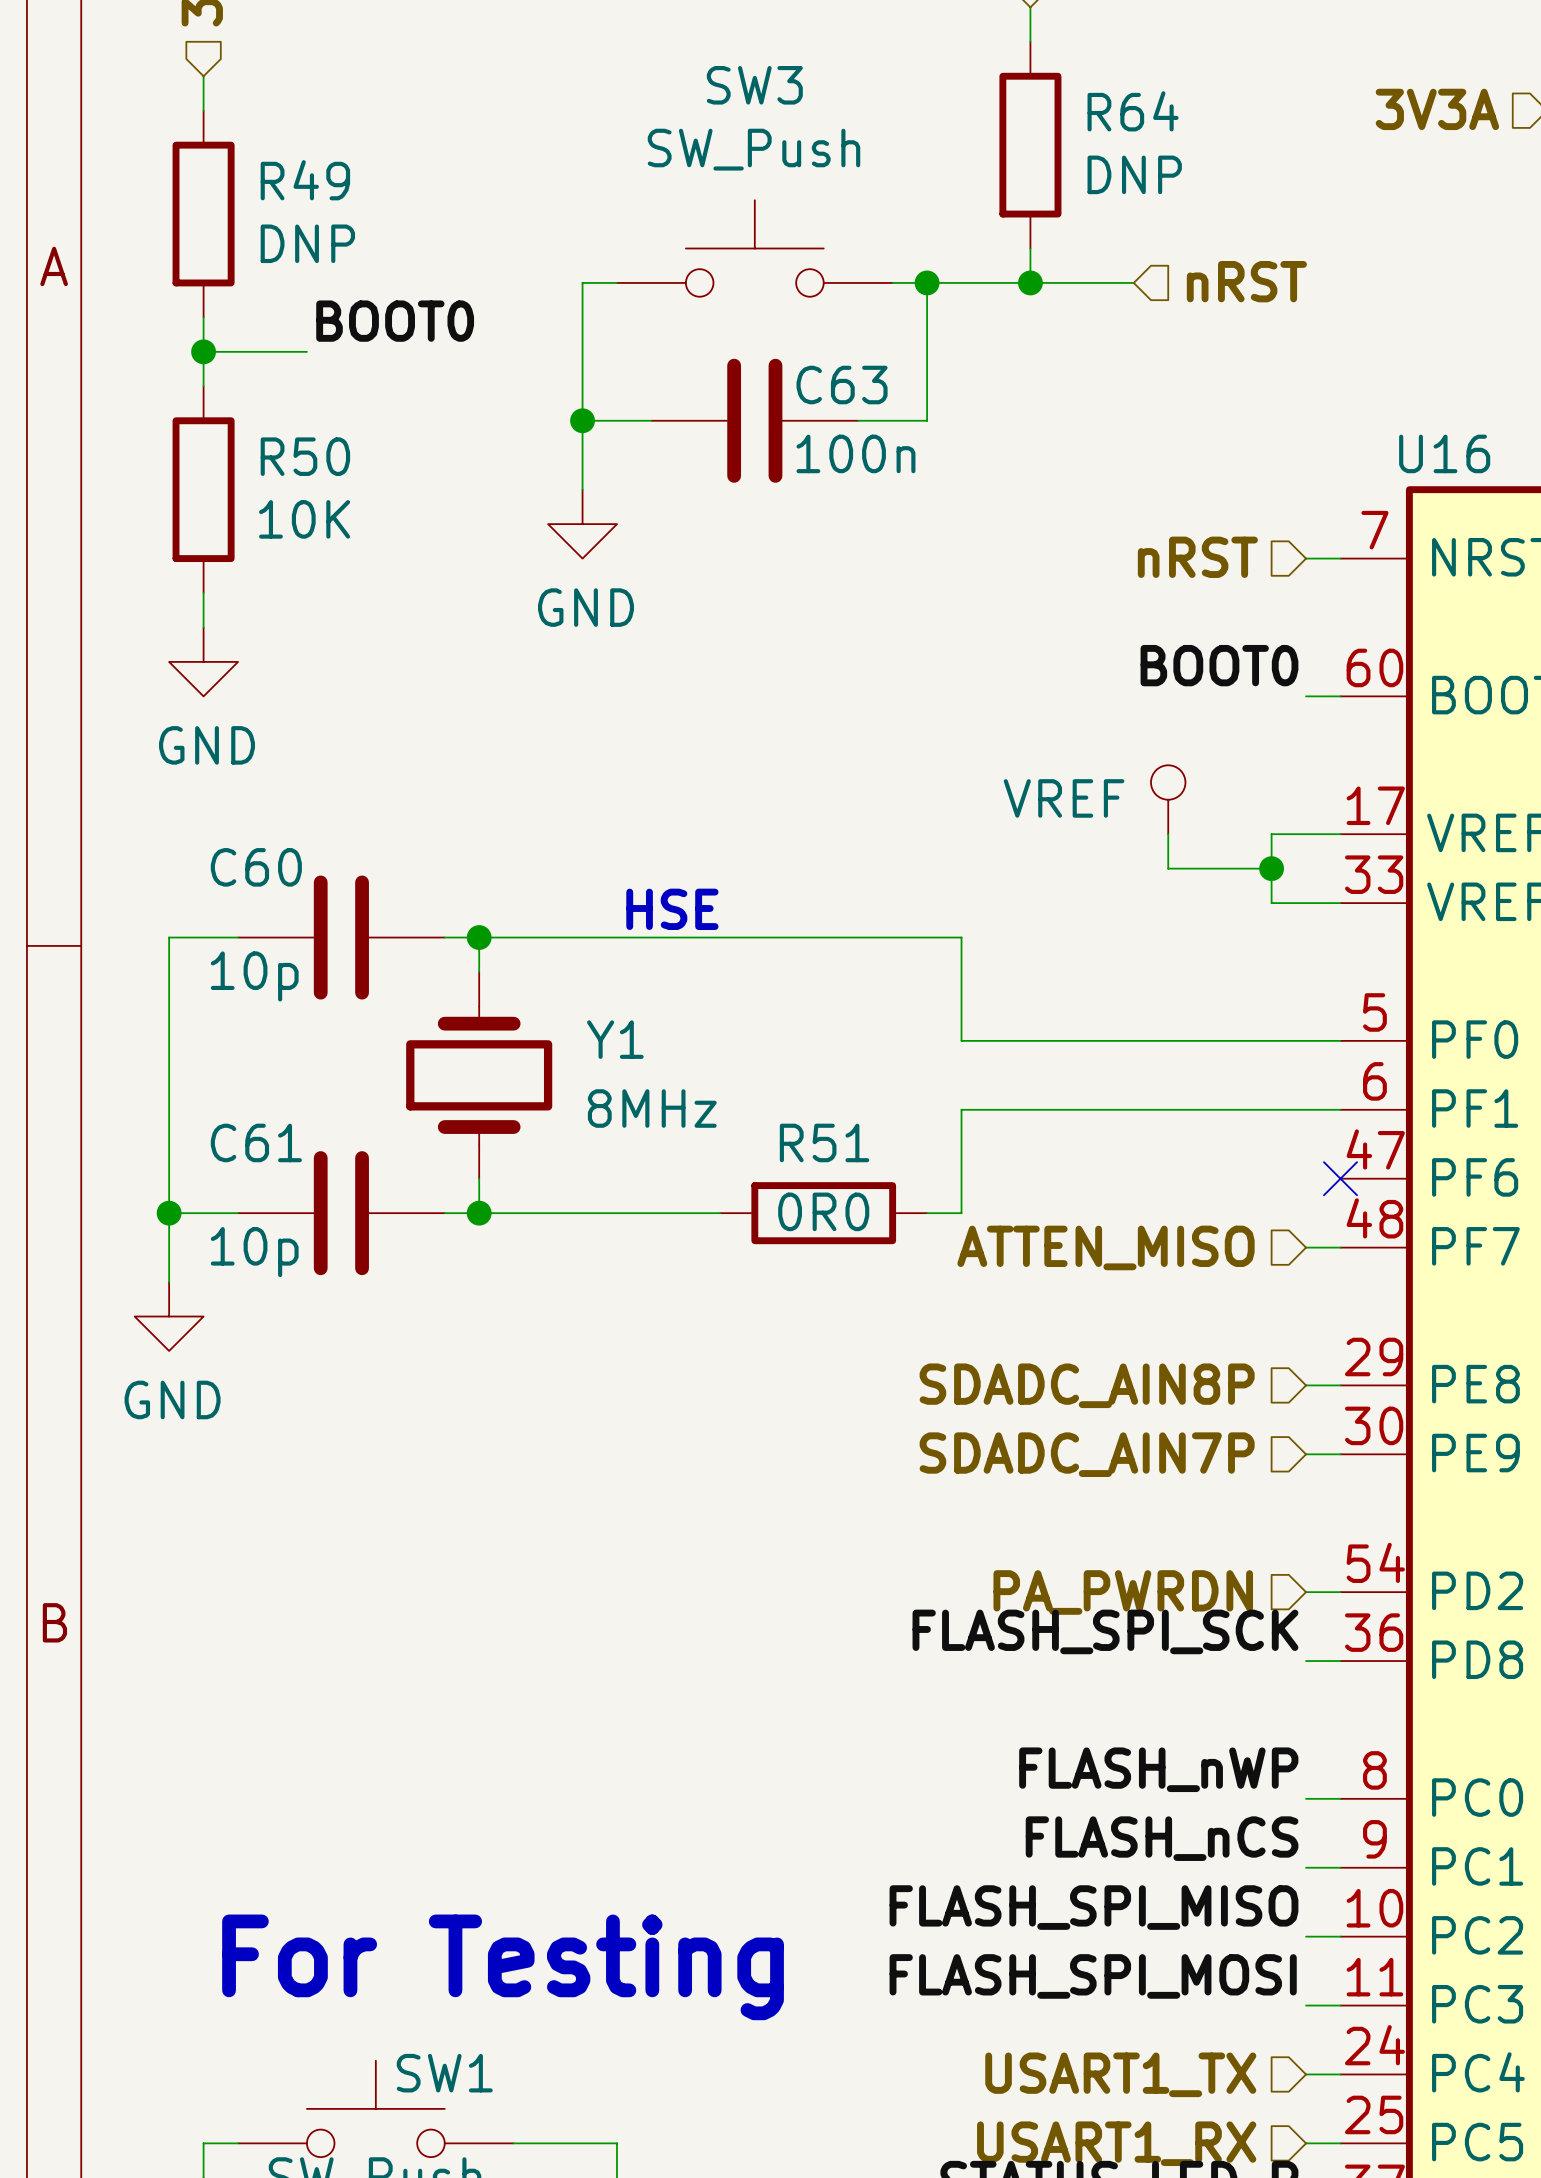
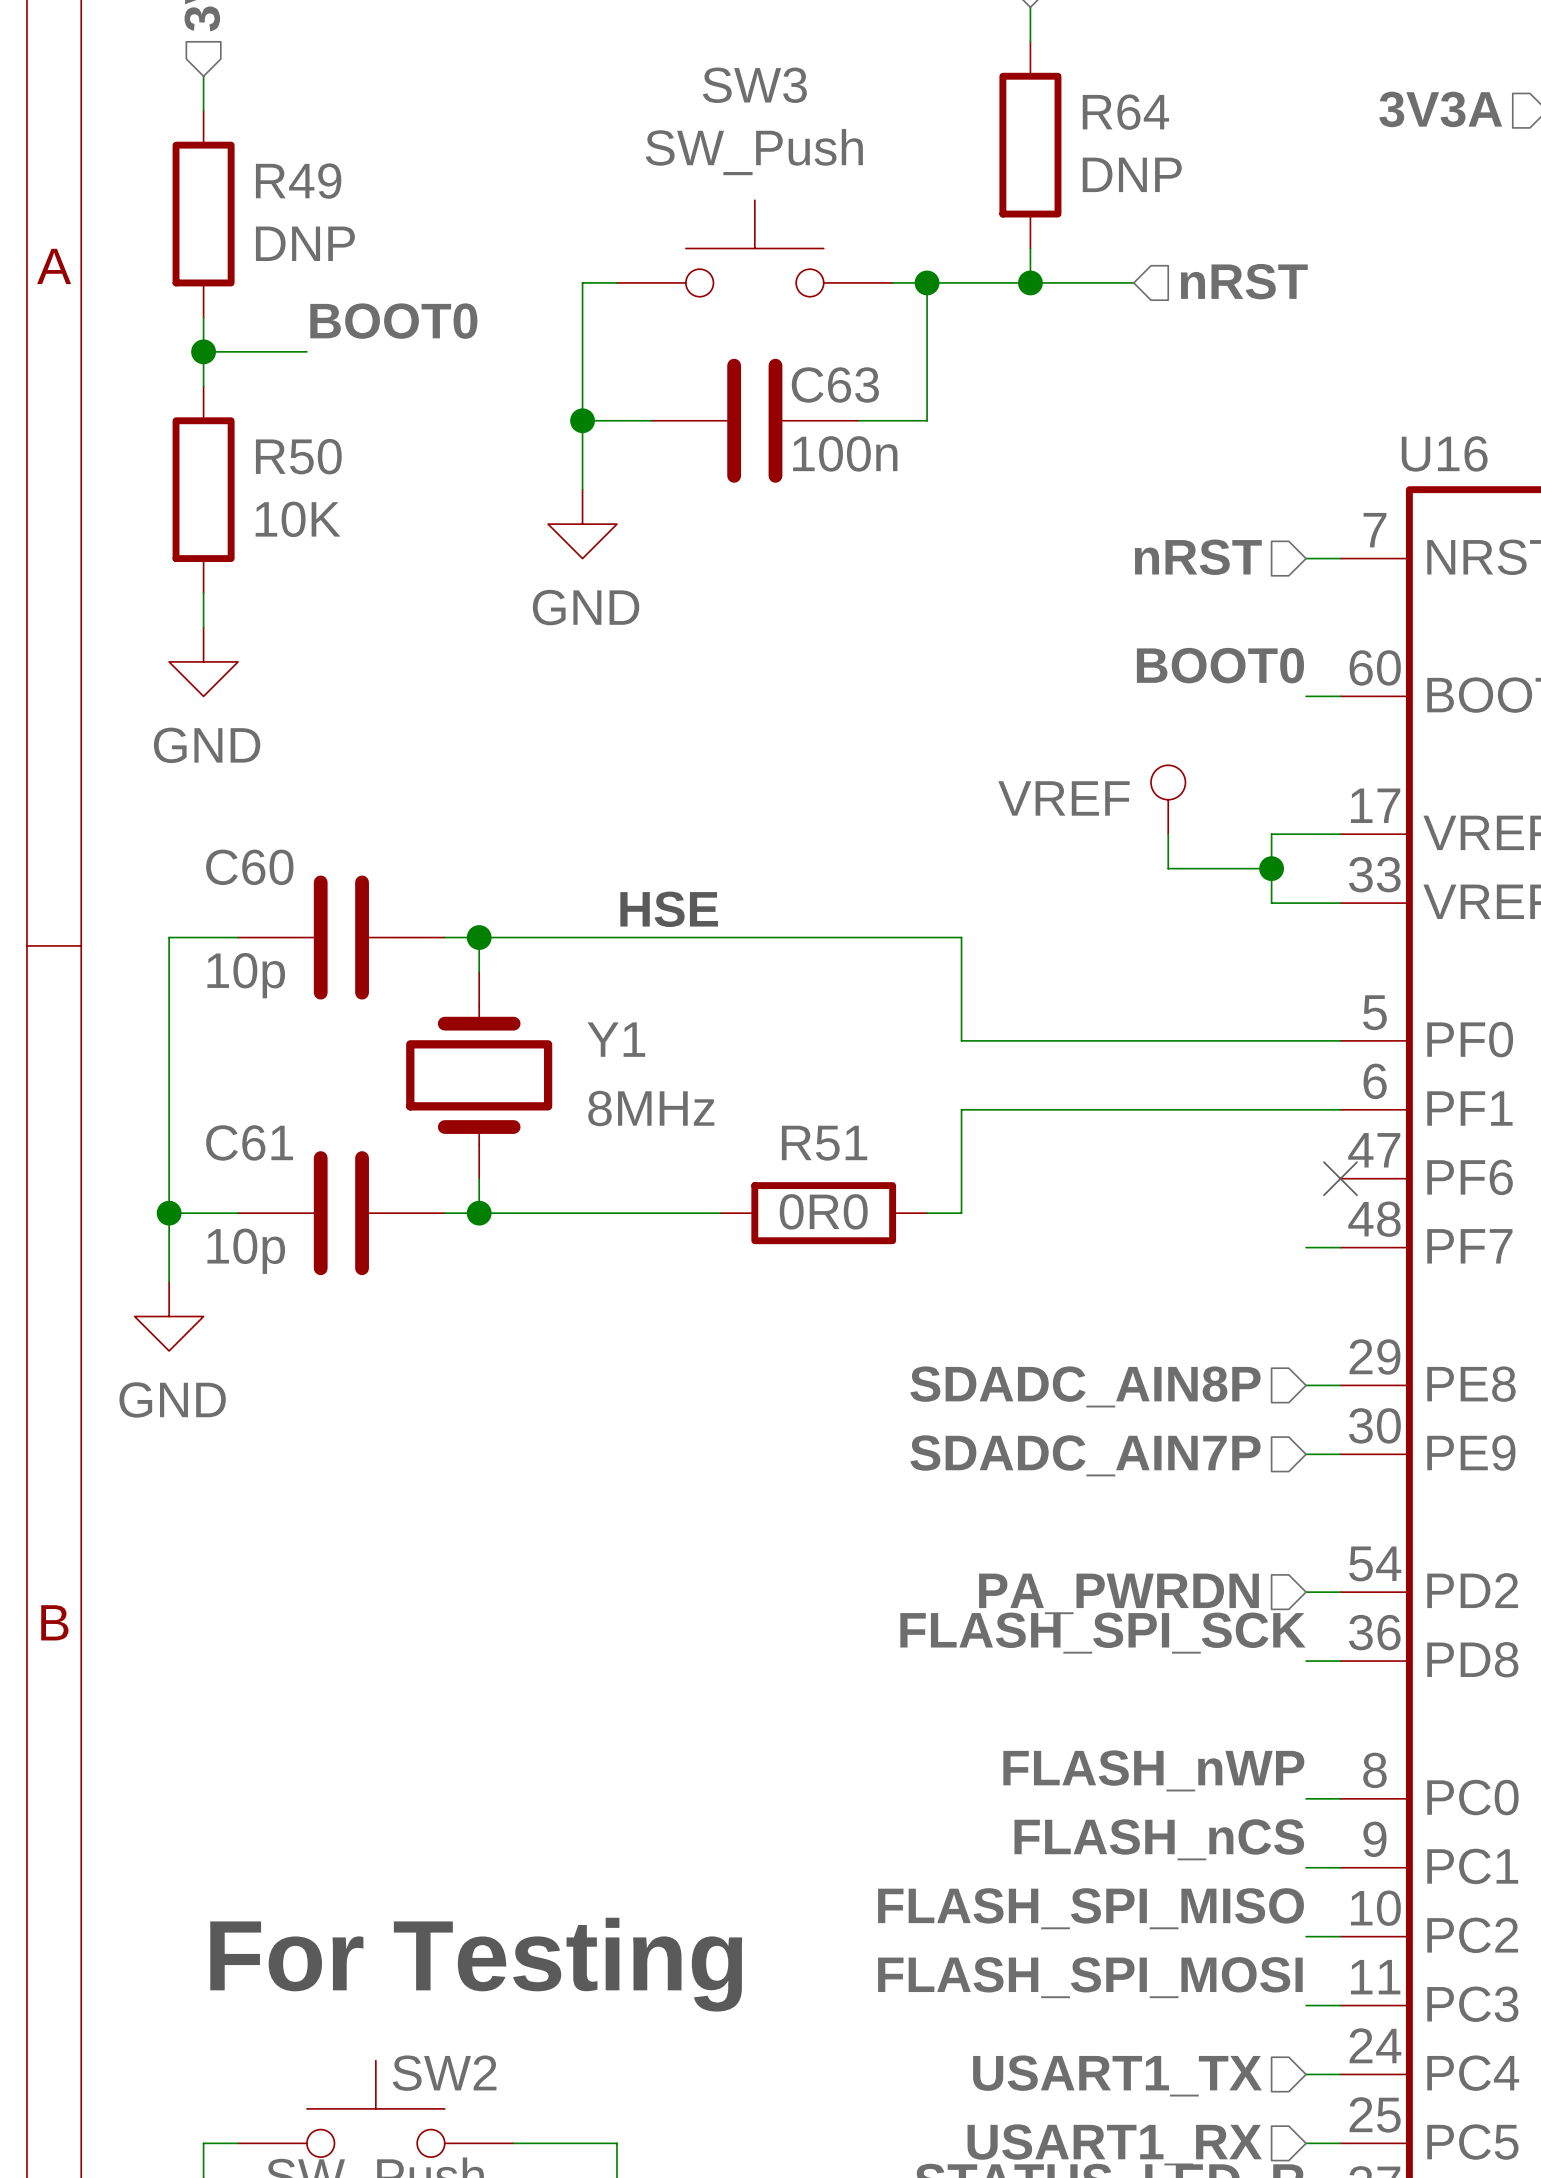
hierarchical label: ATTEN_MISO (1106, 1247) -> none
SW1 name: SW1 (444, 2073) -> SW2 (444, 2073)

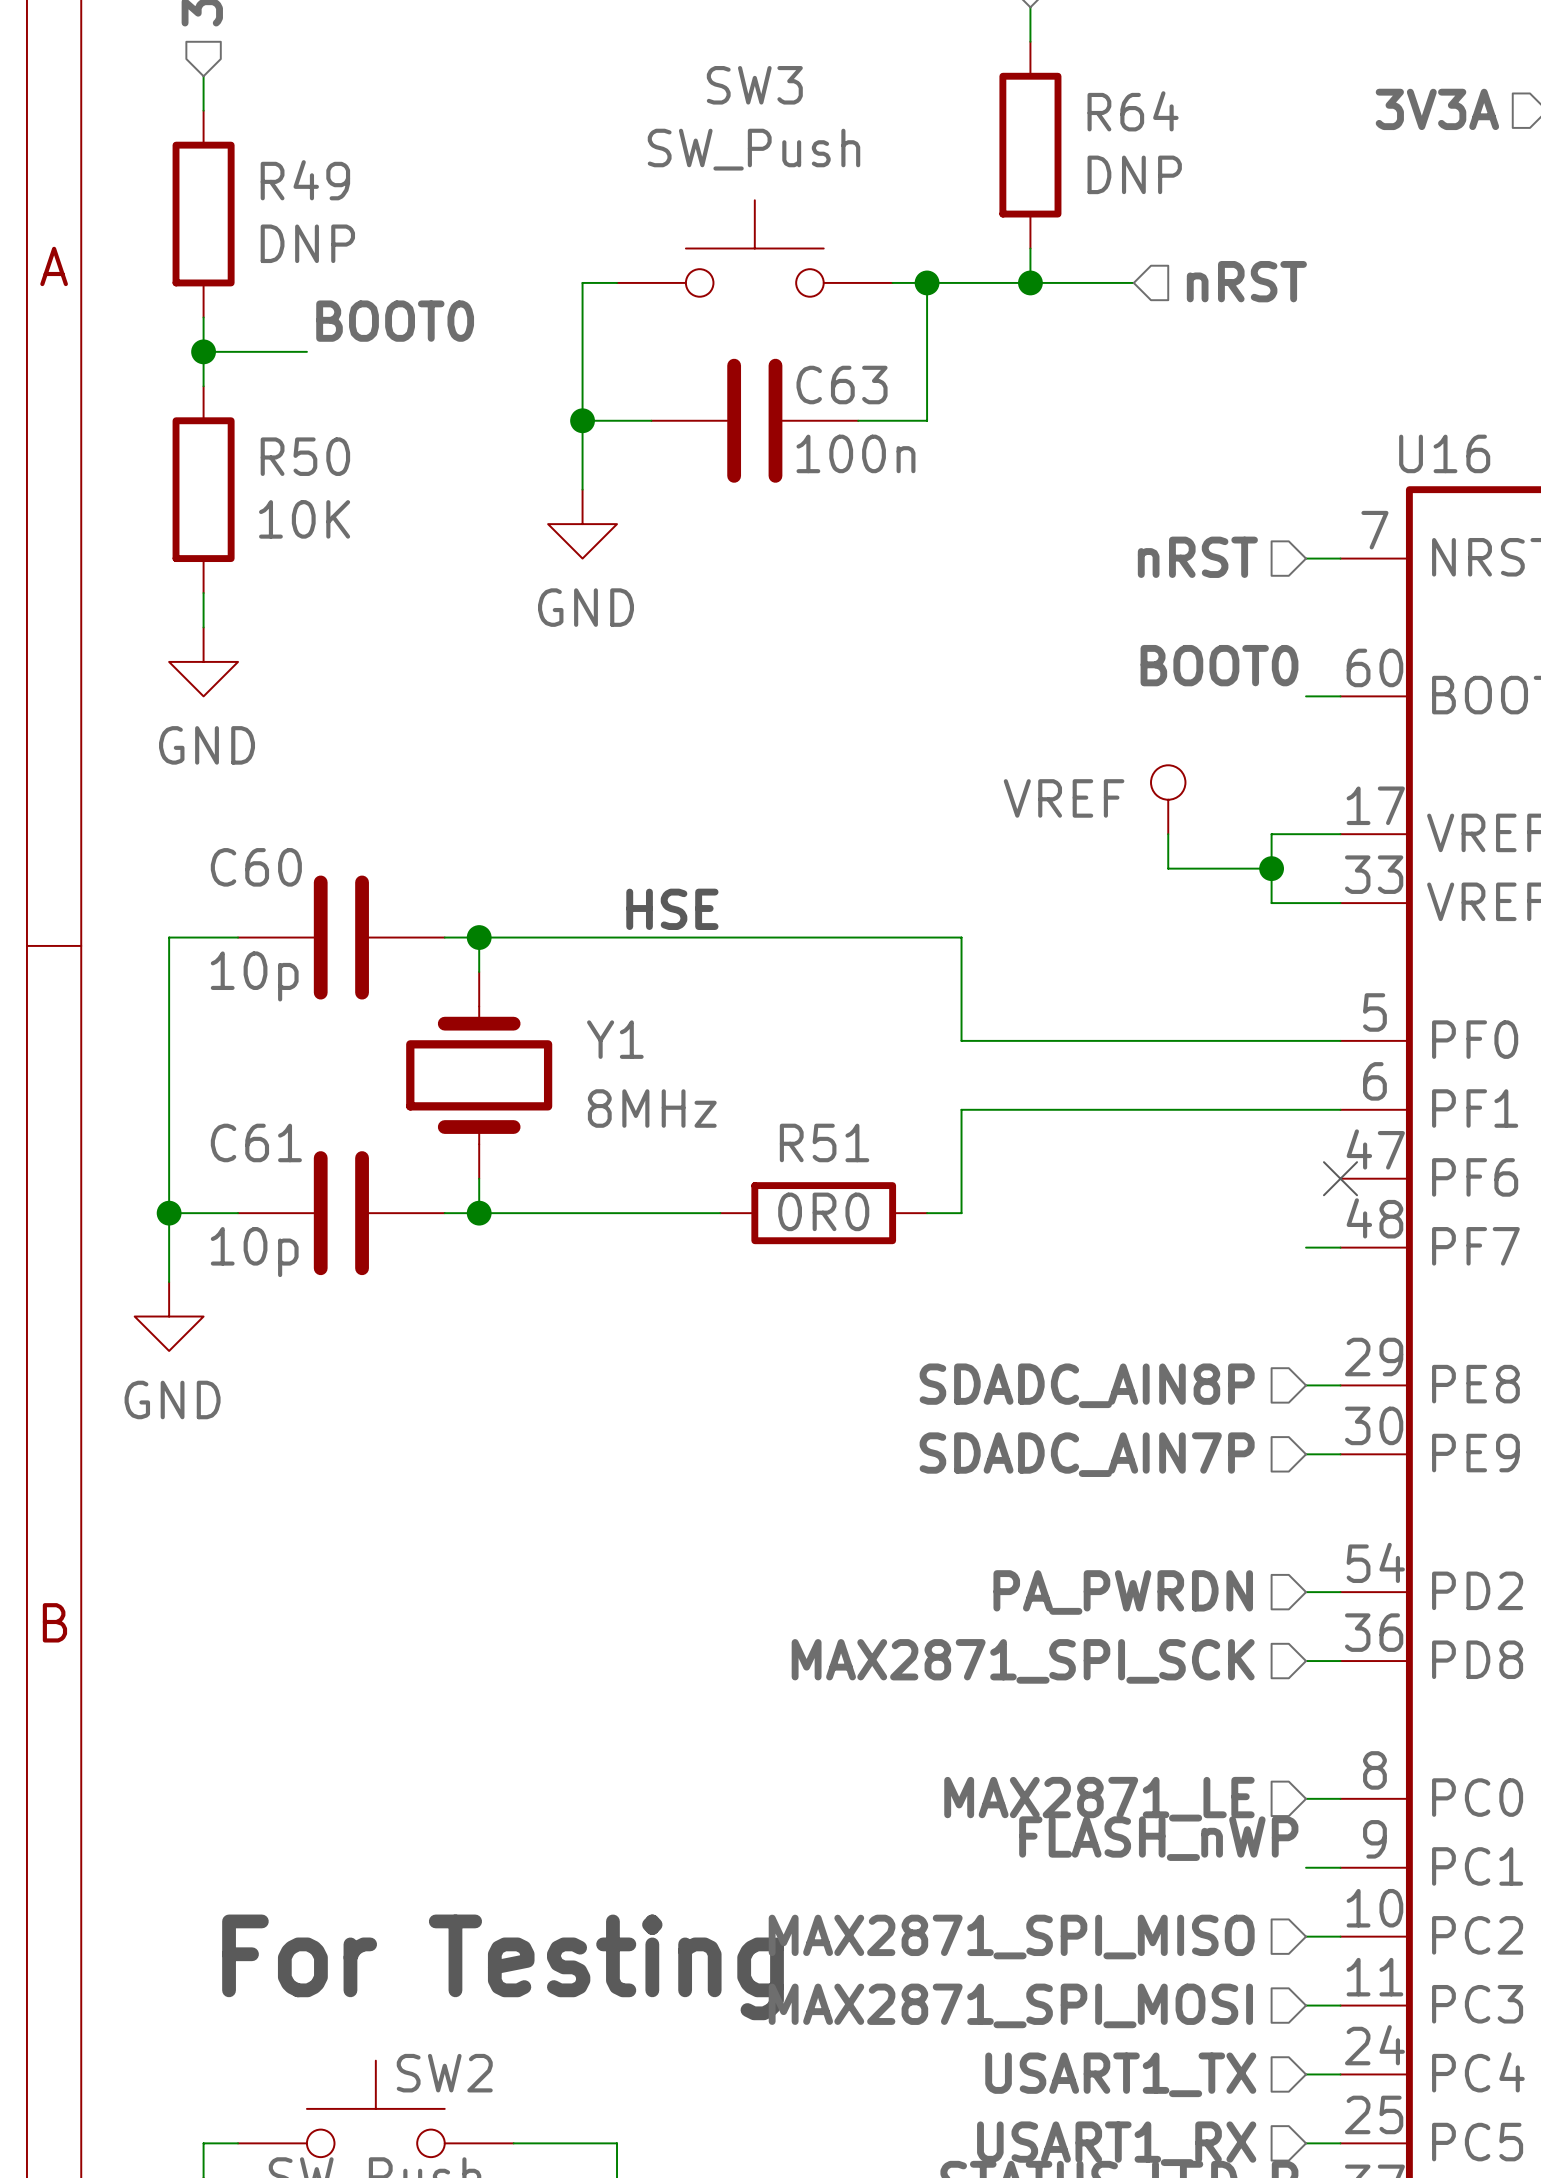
label: FLASH_SPI_SCK (1102, 1633) -> none
hierarchical label: none -> MAX2871_SPI_SCK (1023, 1661)
label: FLASH_nWP (1153, 1770) -> none
hierarchical label: none -> MAX2871_LE (1099, 1799)
label: FLASH_nCS (1159, 1839) -> FLASH_nWP (1158, 1838)
label: FLASH_SPI_MISO (1091, 1908) -> none
hierarchical label: none -> MAX2871_SPI_MISO (1011, 1937)
label: FLASH_SPI_MOSI (1090, 1977) -> none
hierarchical label: none -> MAX2871_SPI_MOSI (1010, 2005)

